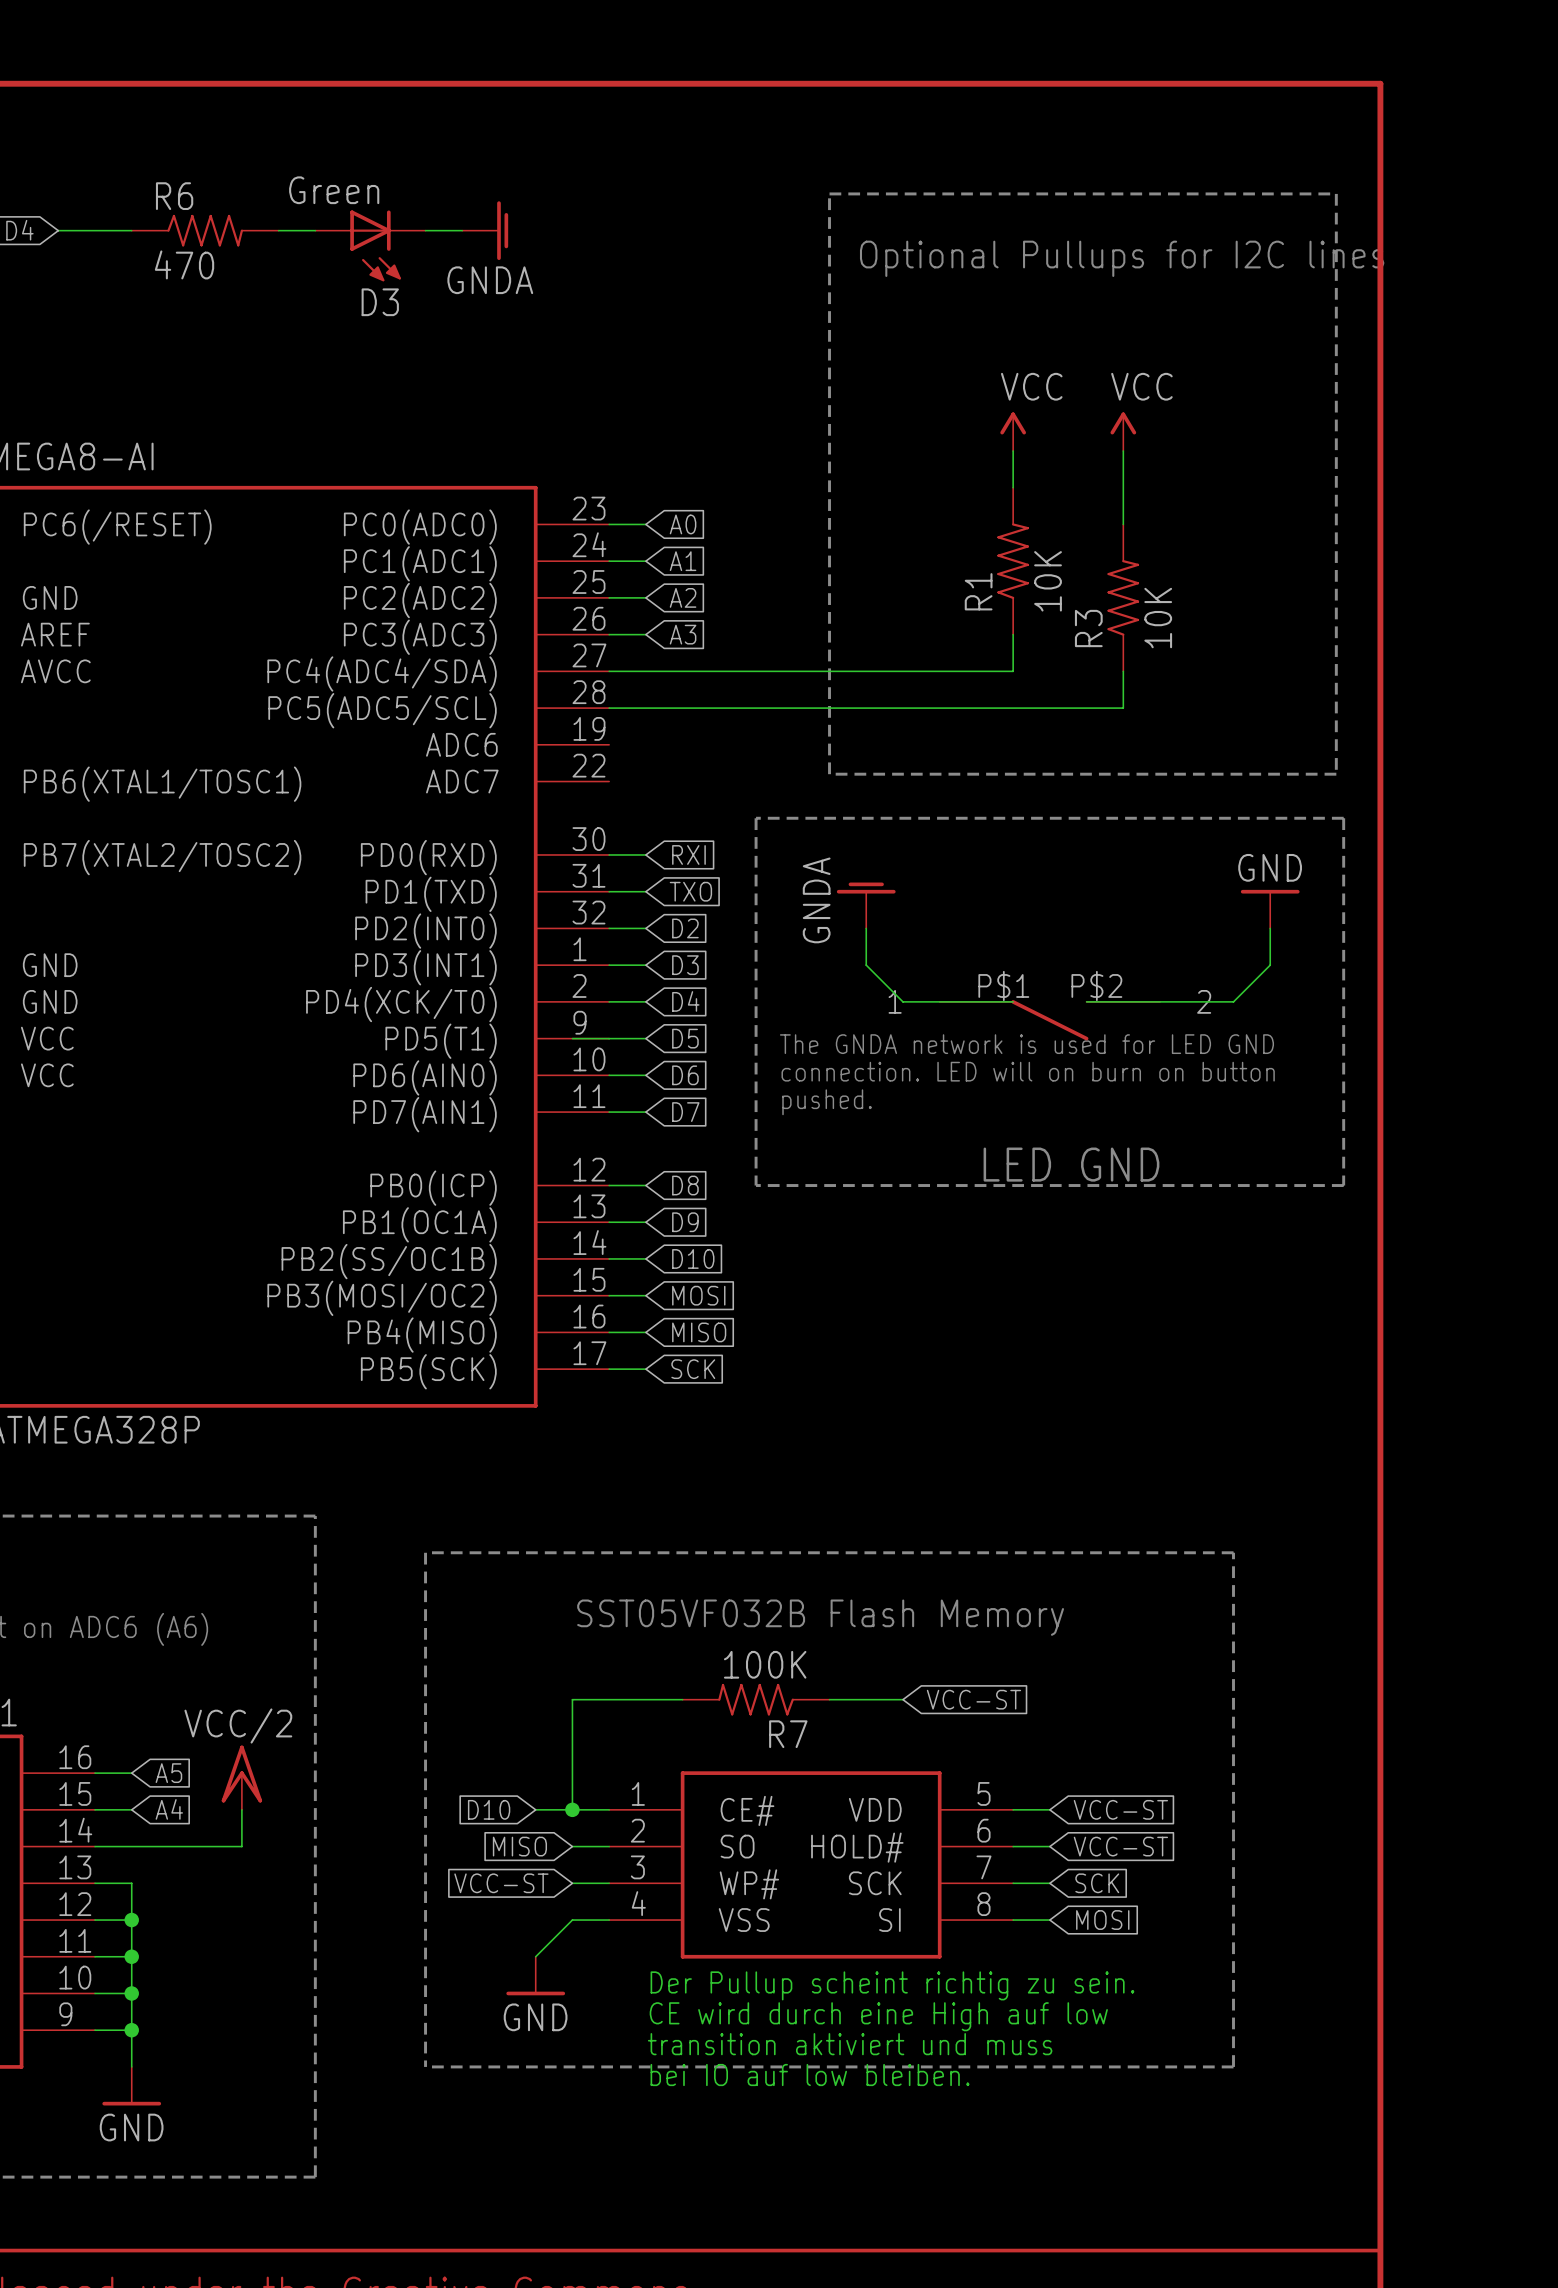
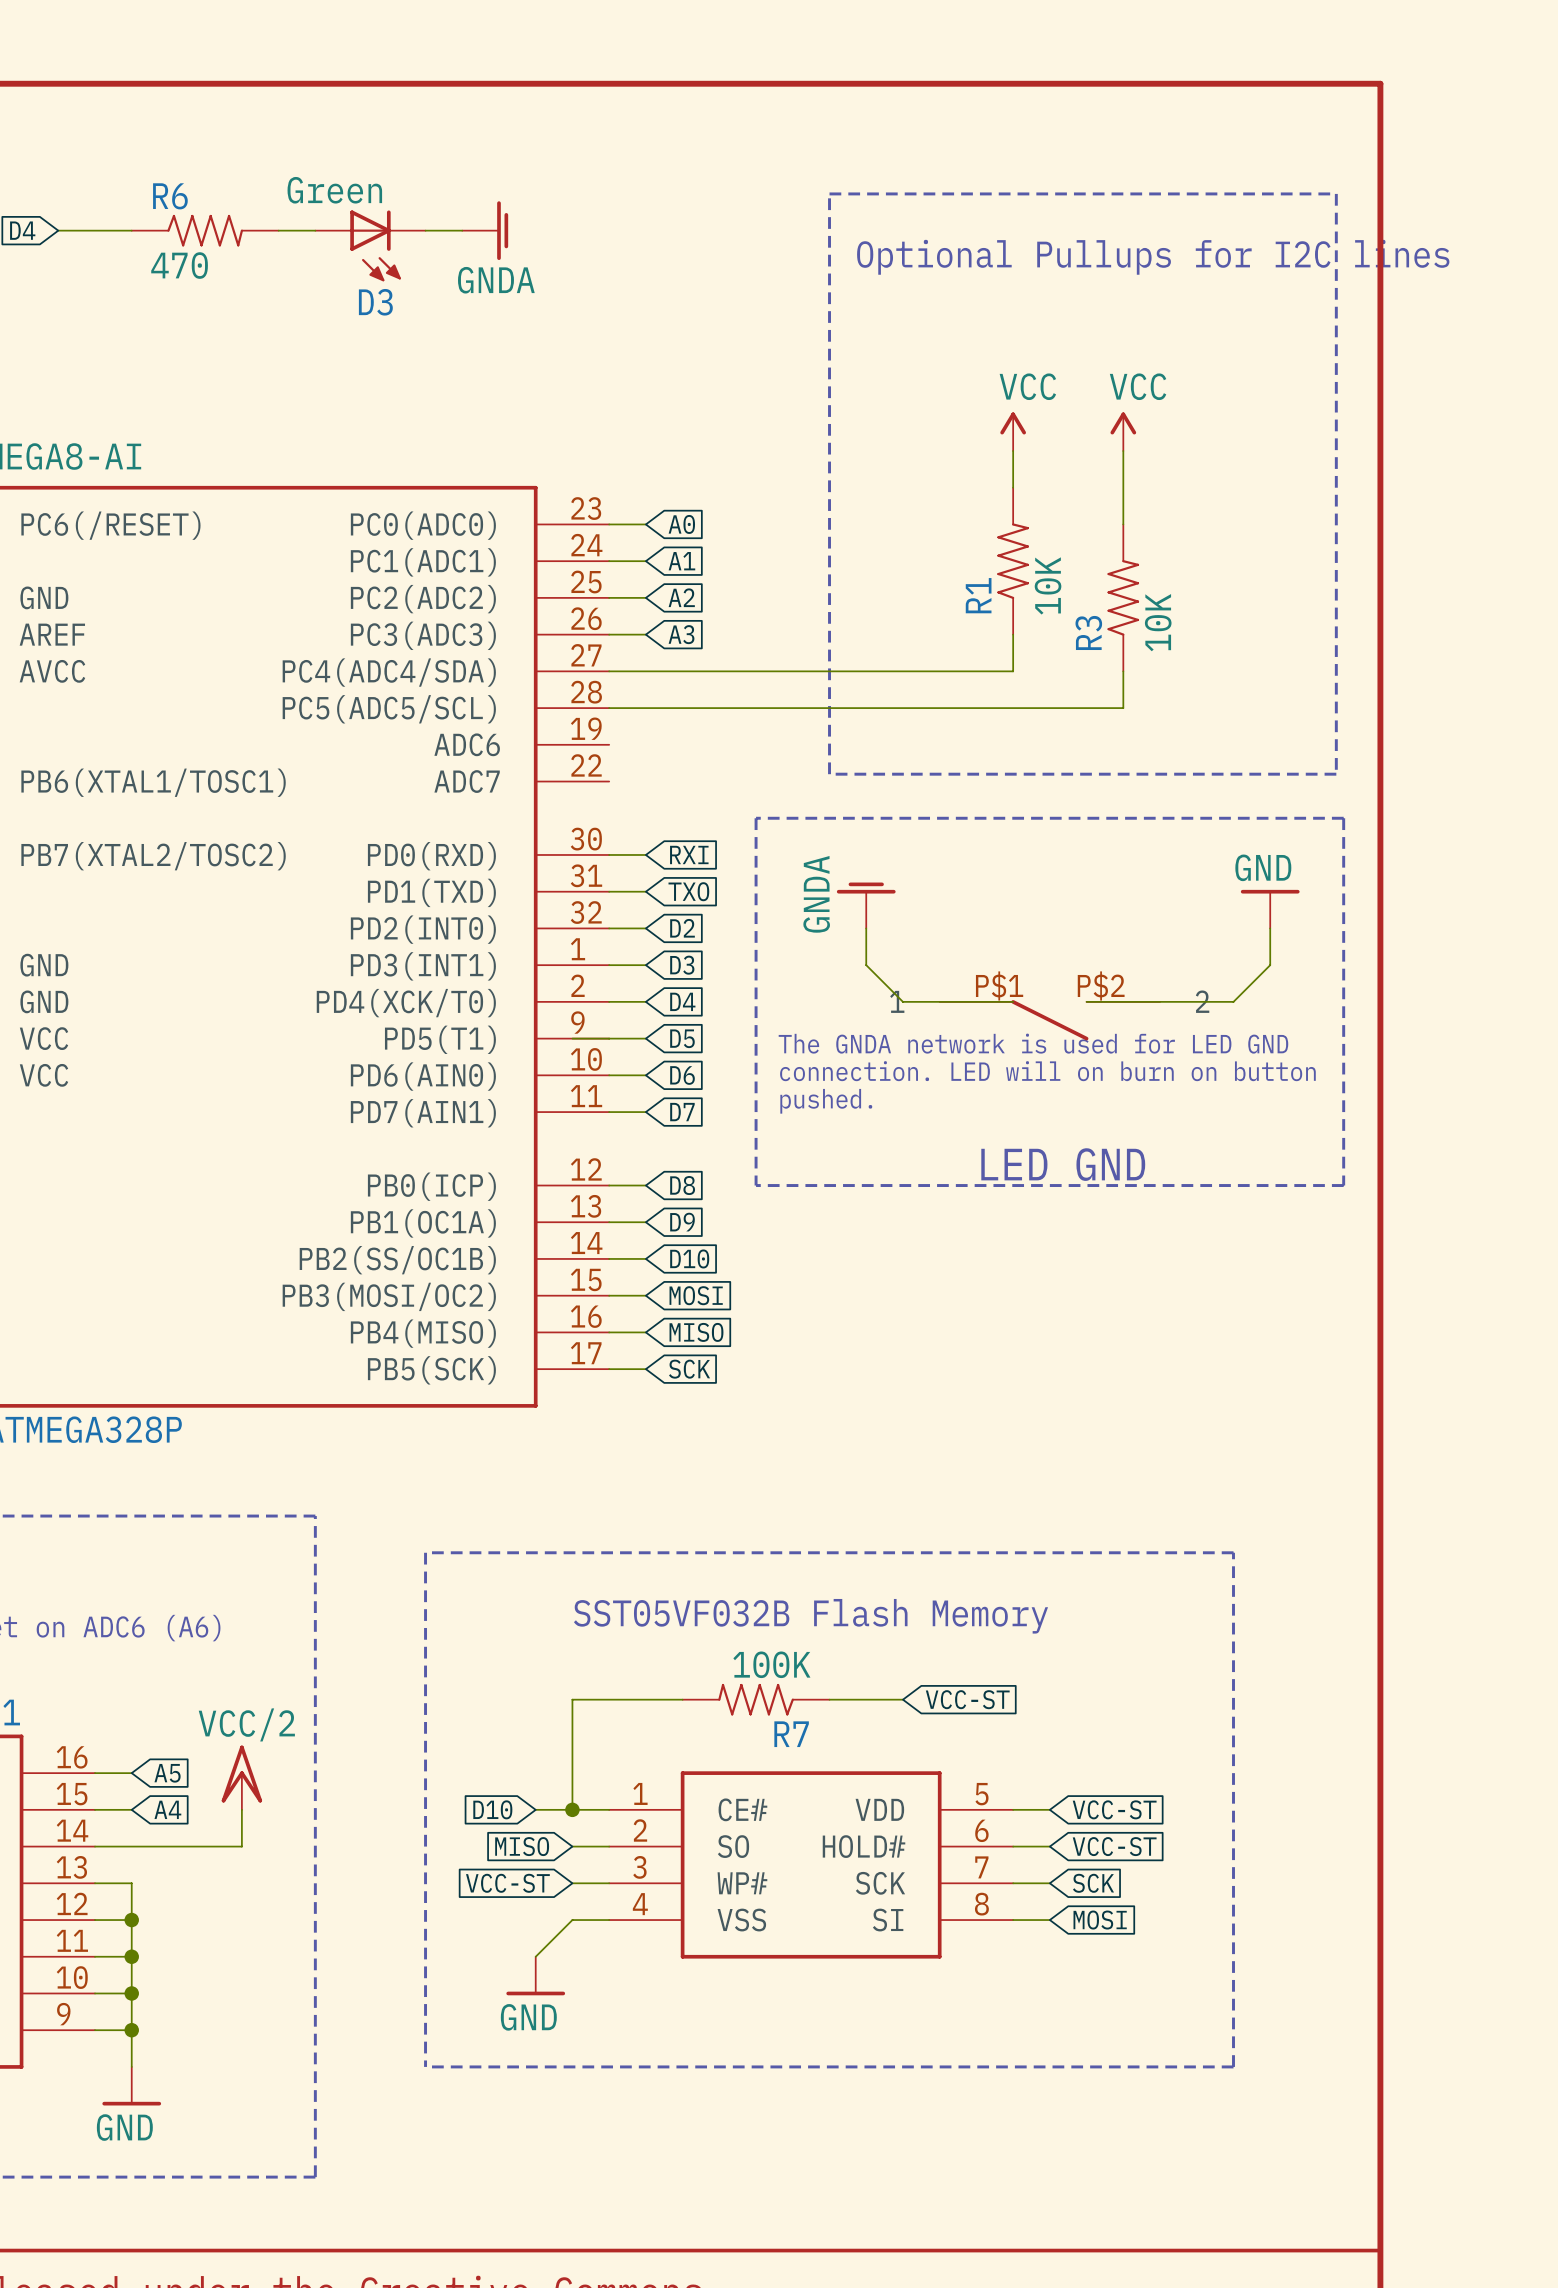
text: Der Pullup scheint richtig zu sein. (892, 1985) -> none
text: CE wird durch eine High auf low (878, 2016) -> none
text: transition aktiviert und muss (850, 2044) -> none
text: bei IO auf low bleiben. (810, 2075) -> none

